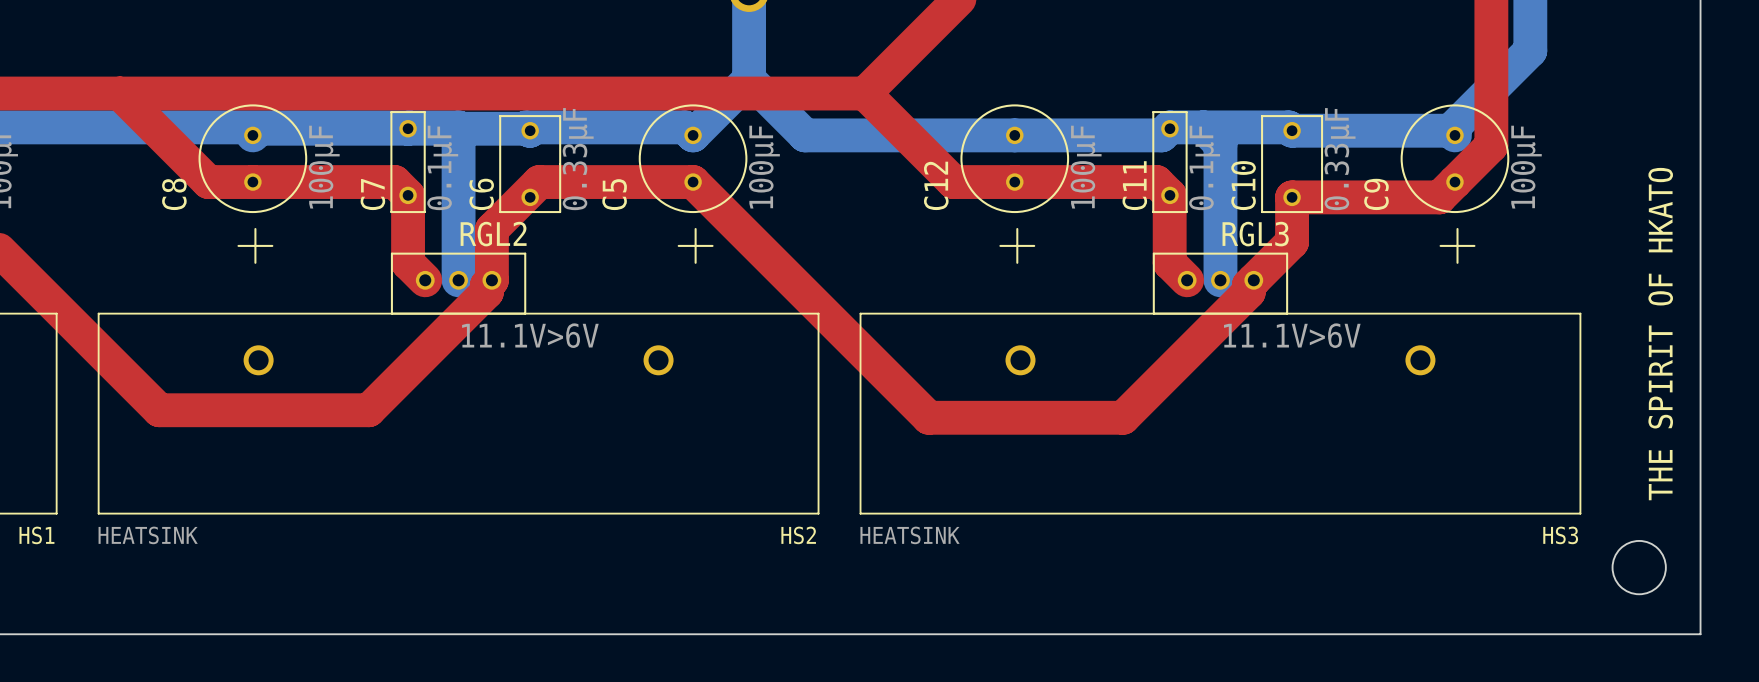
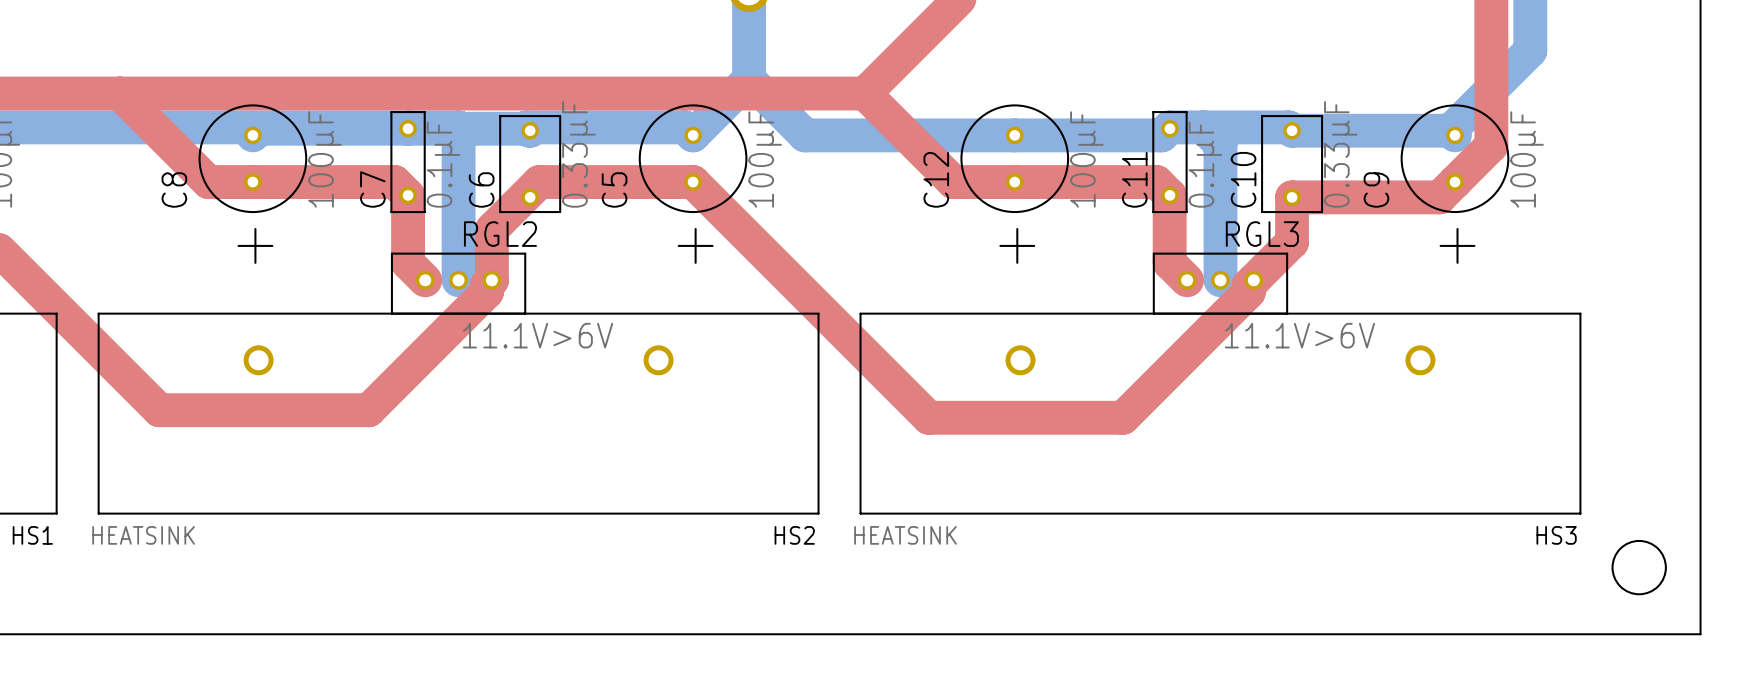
text: THE SPIRIT OF HKATO (1660, 334) -> none

